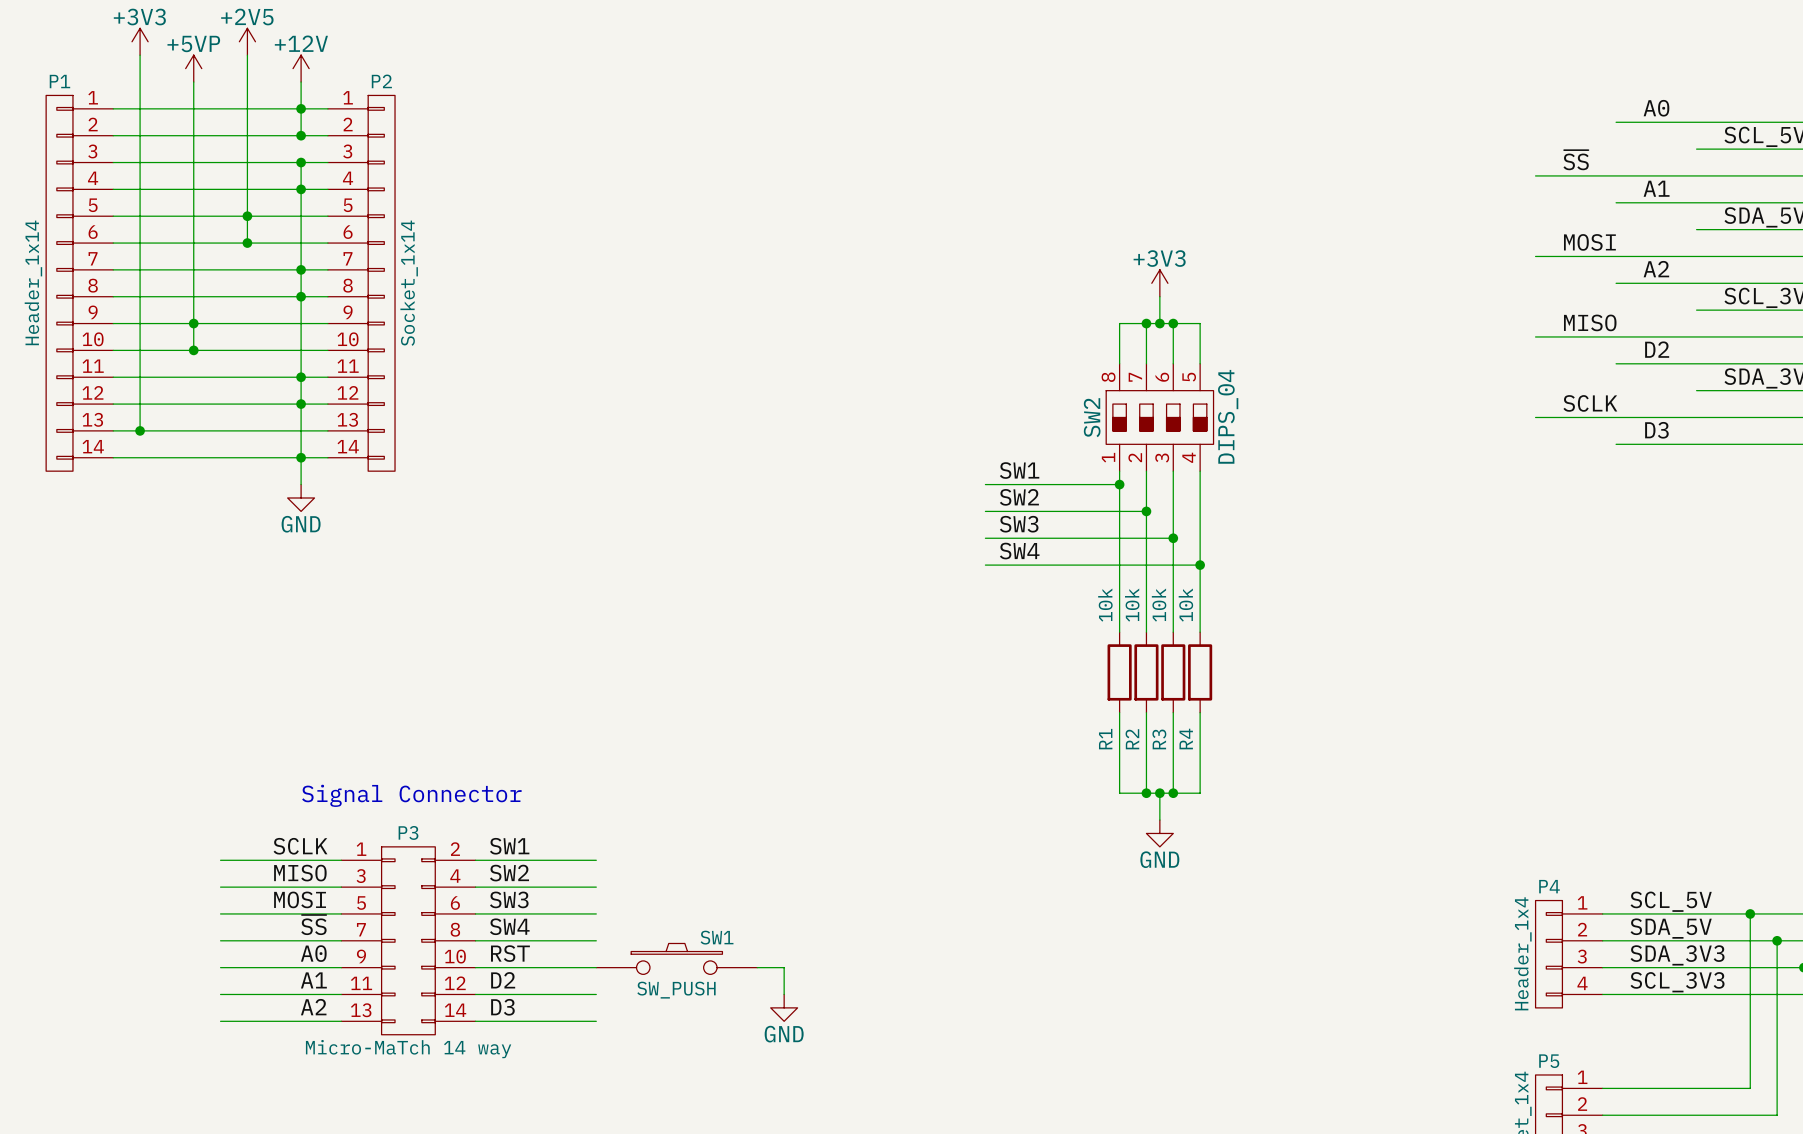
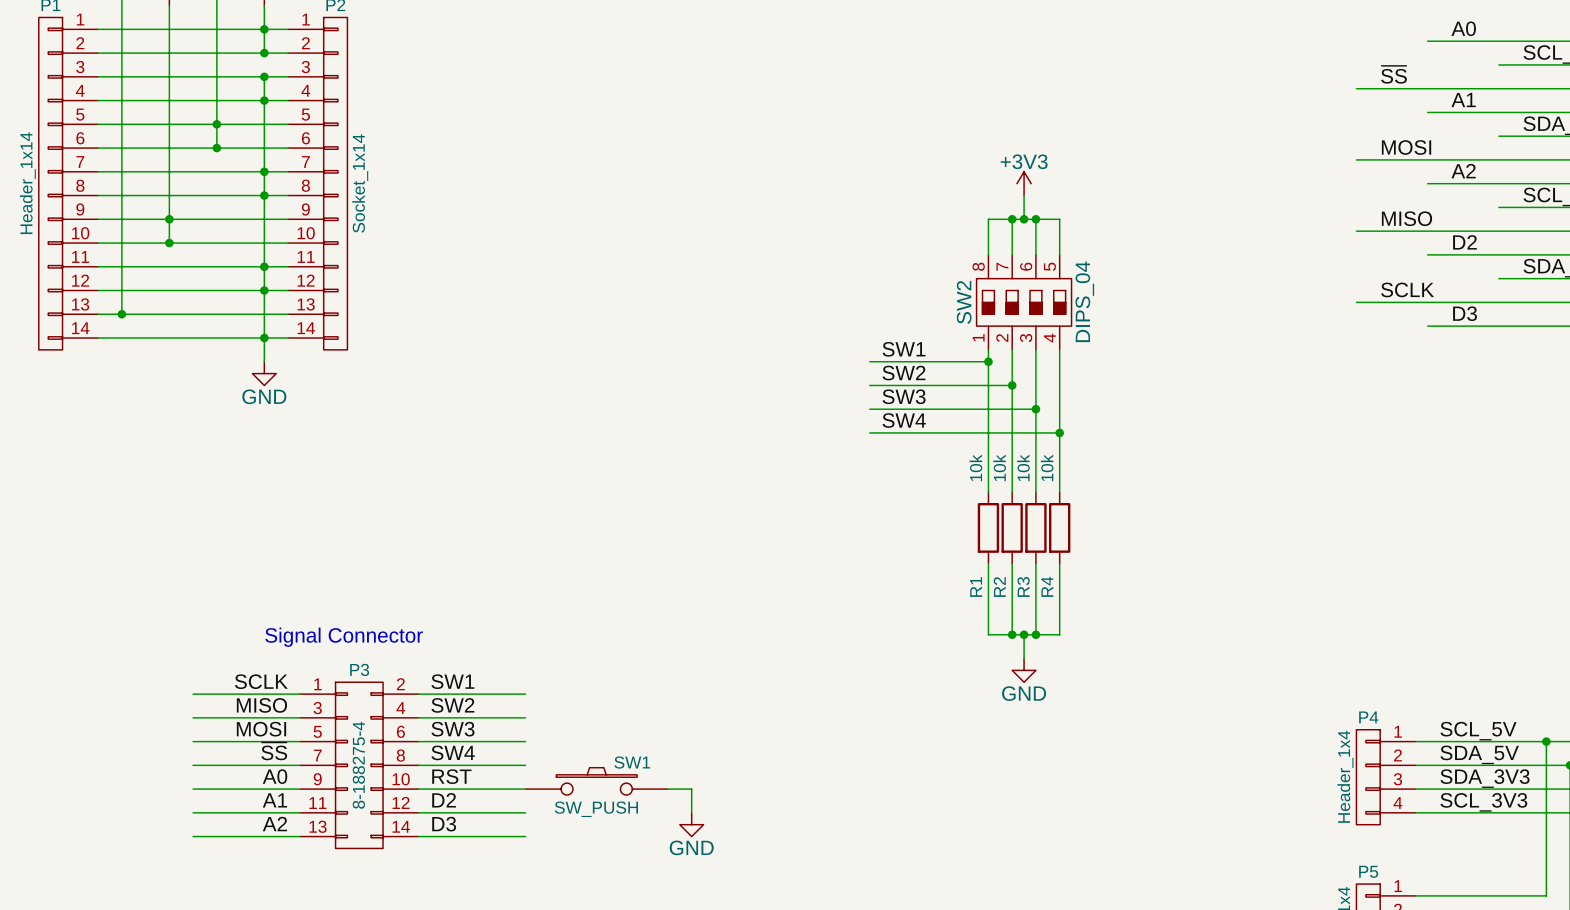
P3 value: Micro-MaTch 14 way (408, 1049) -> 8-188275-4 (358, 765)

